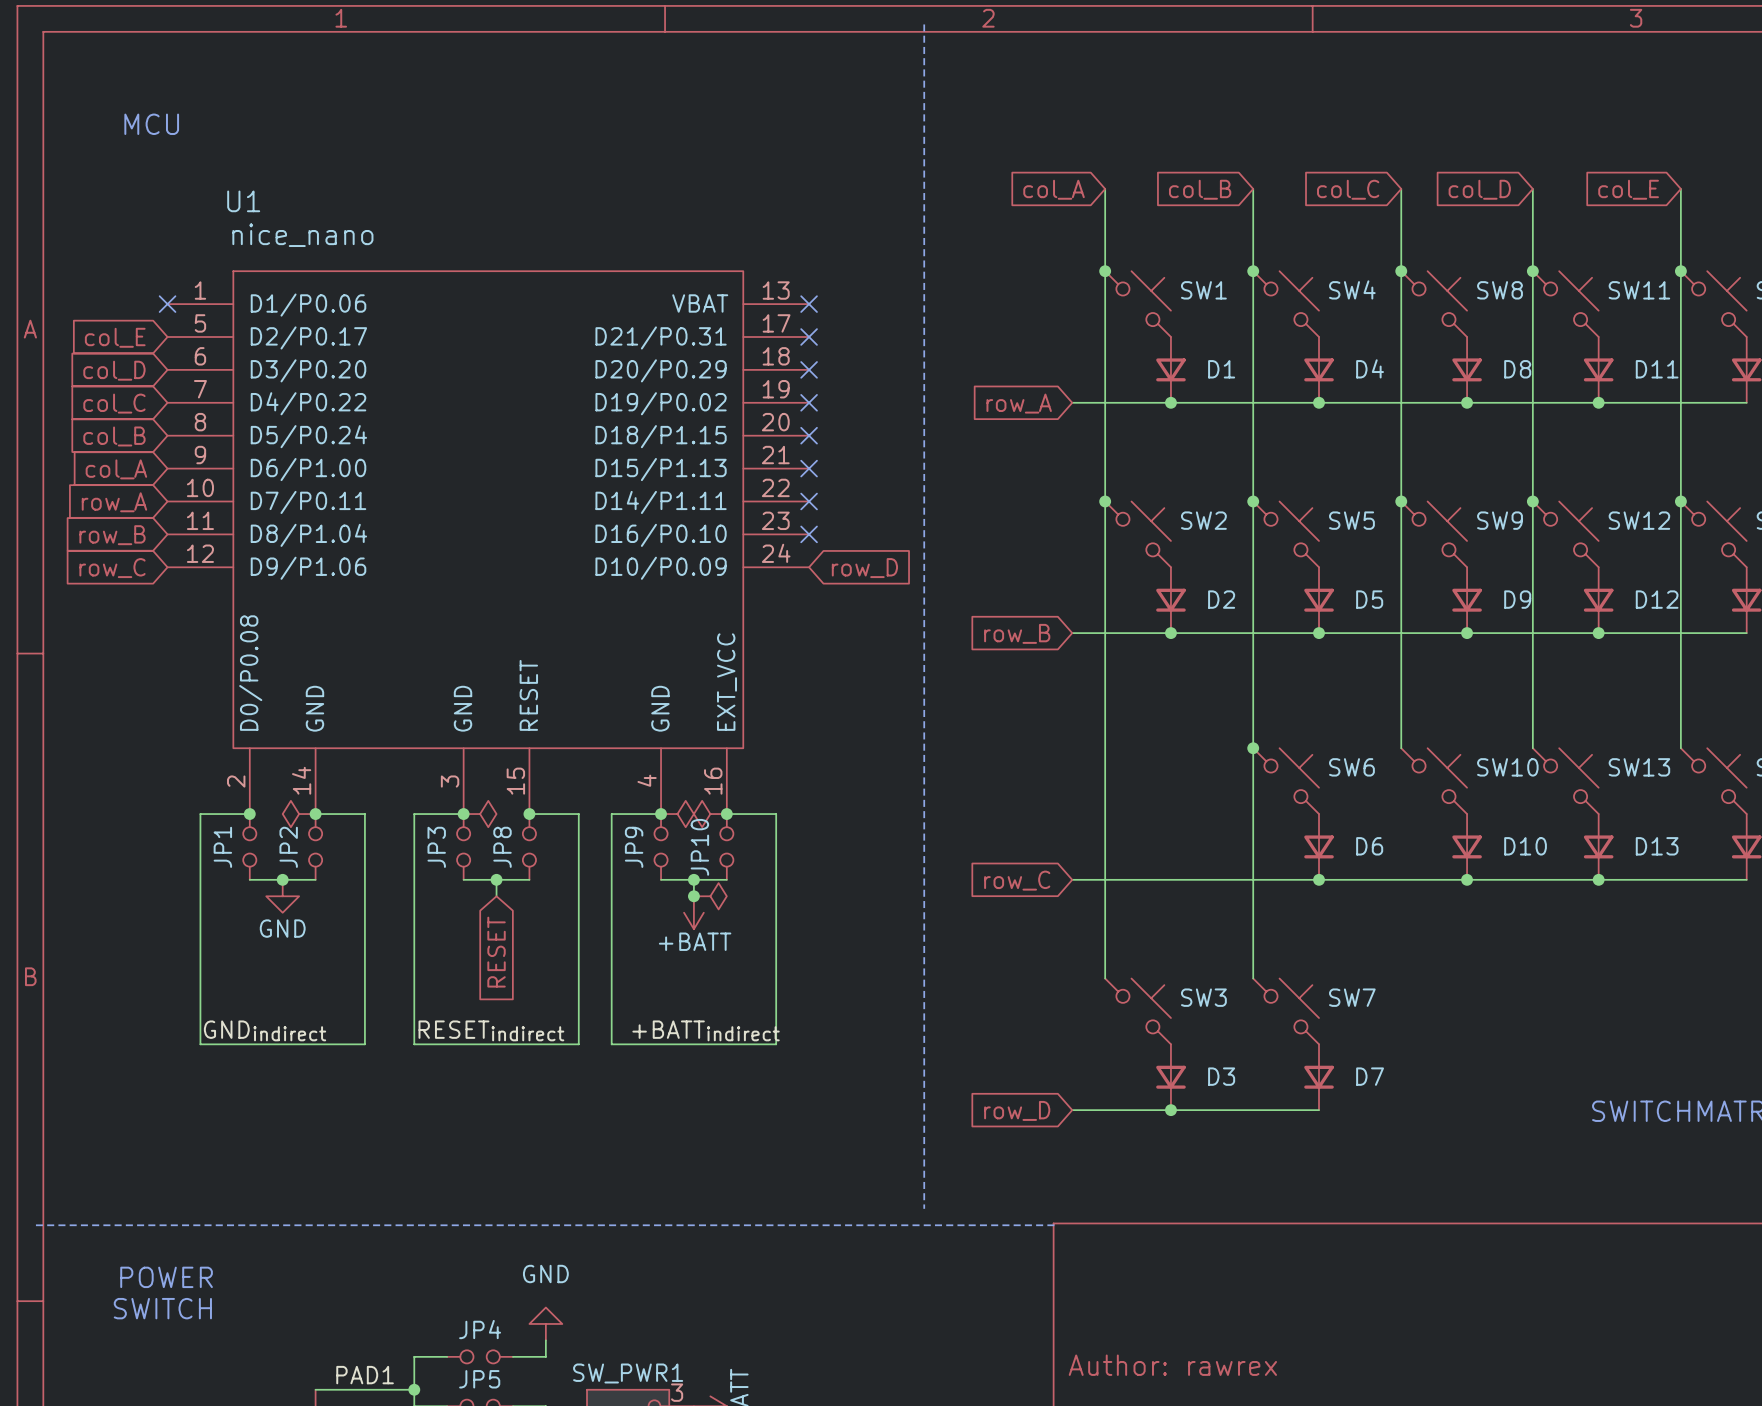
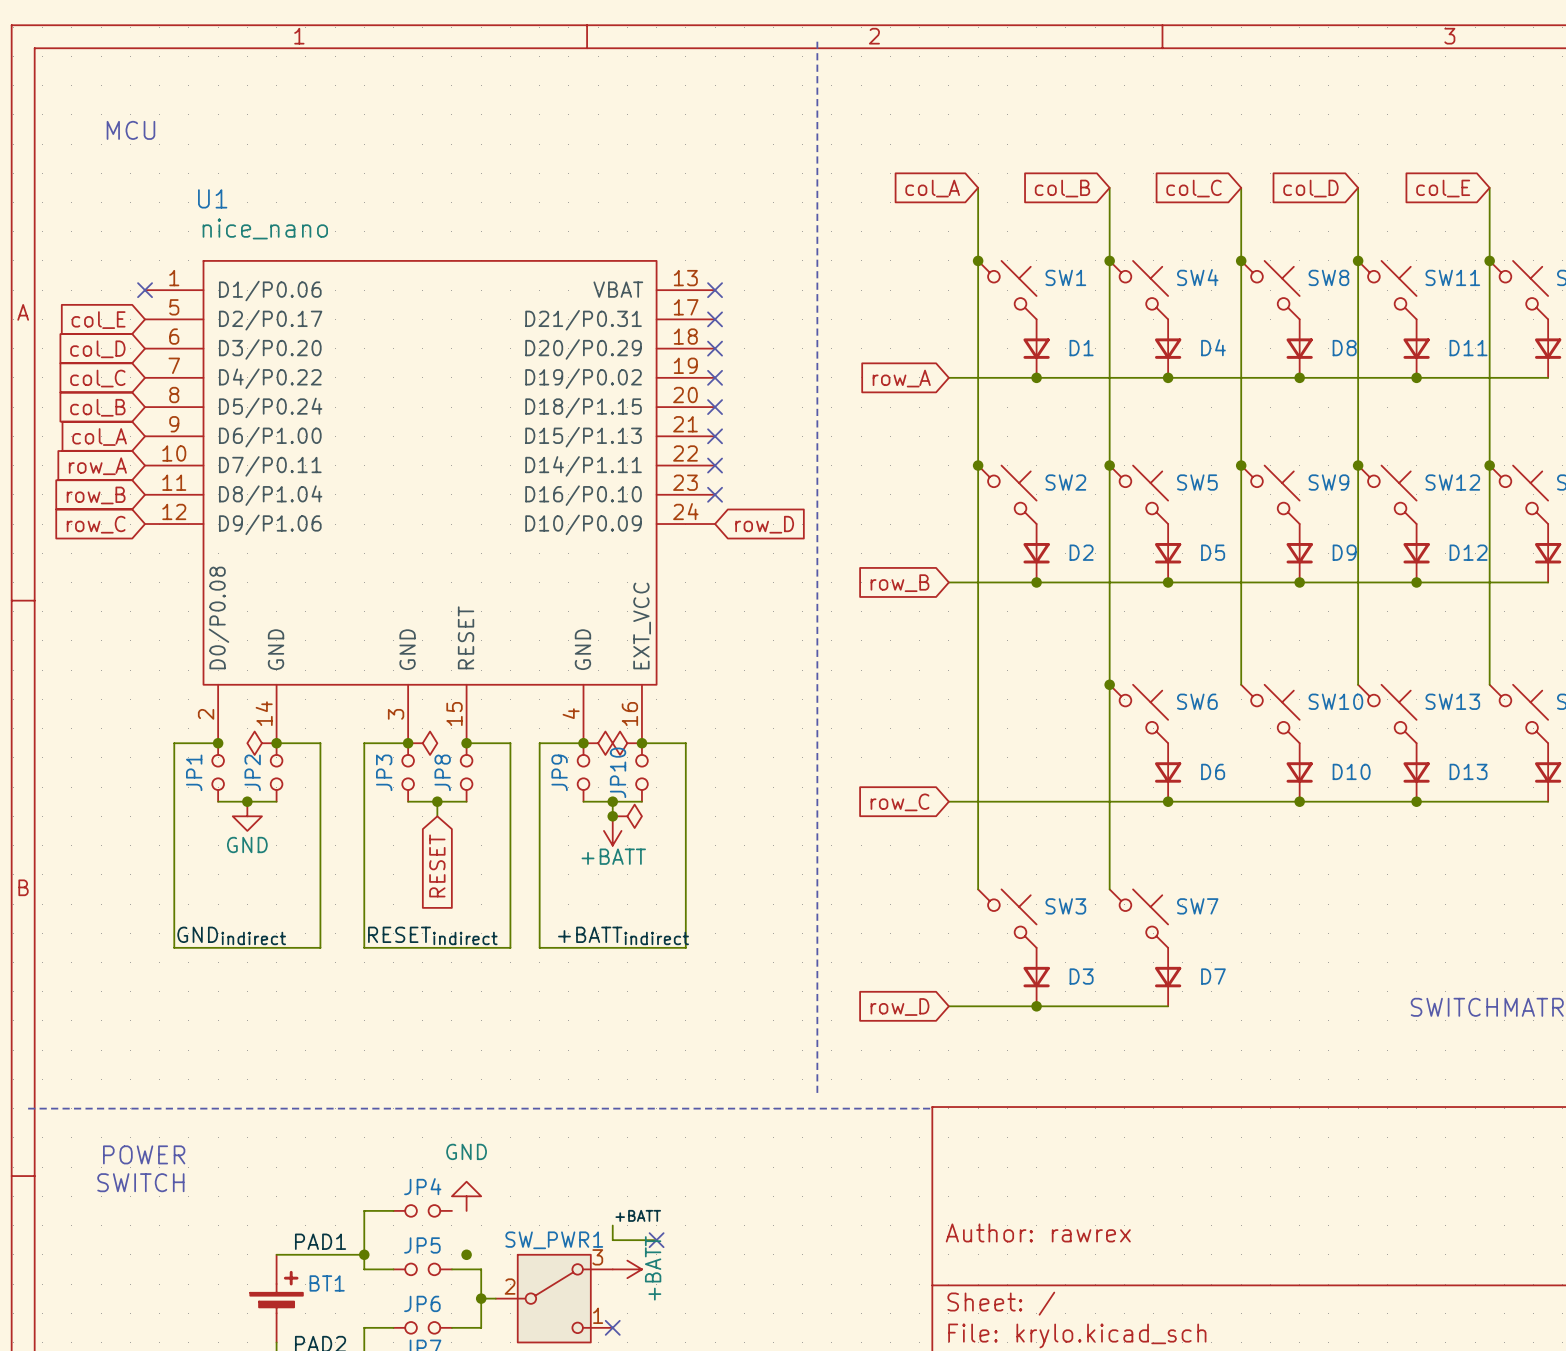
power symbol position: GND (545, 1323) -> GND (466, 1196)
wire: (545, 1340) (545, 1356) (512, 1356) -> none
label: none -> +BATT (638, 1215)
wire: (414, 1356) (447, 1356) -> (364, 1225) (364, 1210) (393, 1210)
JP4 position: (480, 1356) -> (422, 1210)
wire: none -> (612, 1225) (612, 1240) (656, 1240)
no-connect mark: none -> (656, 1240)
junction: none -> (466, 1254)

